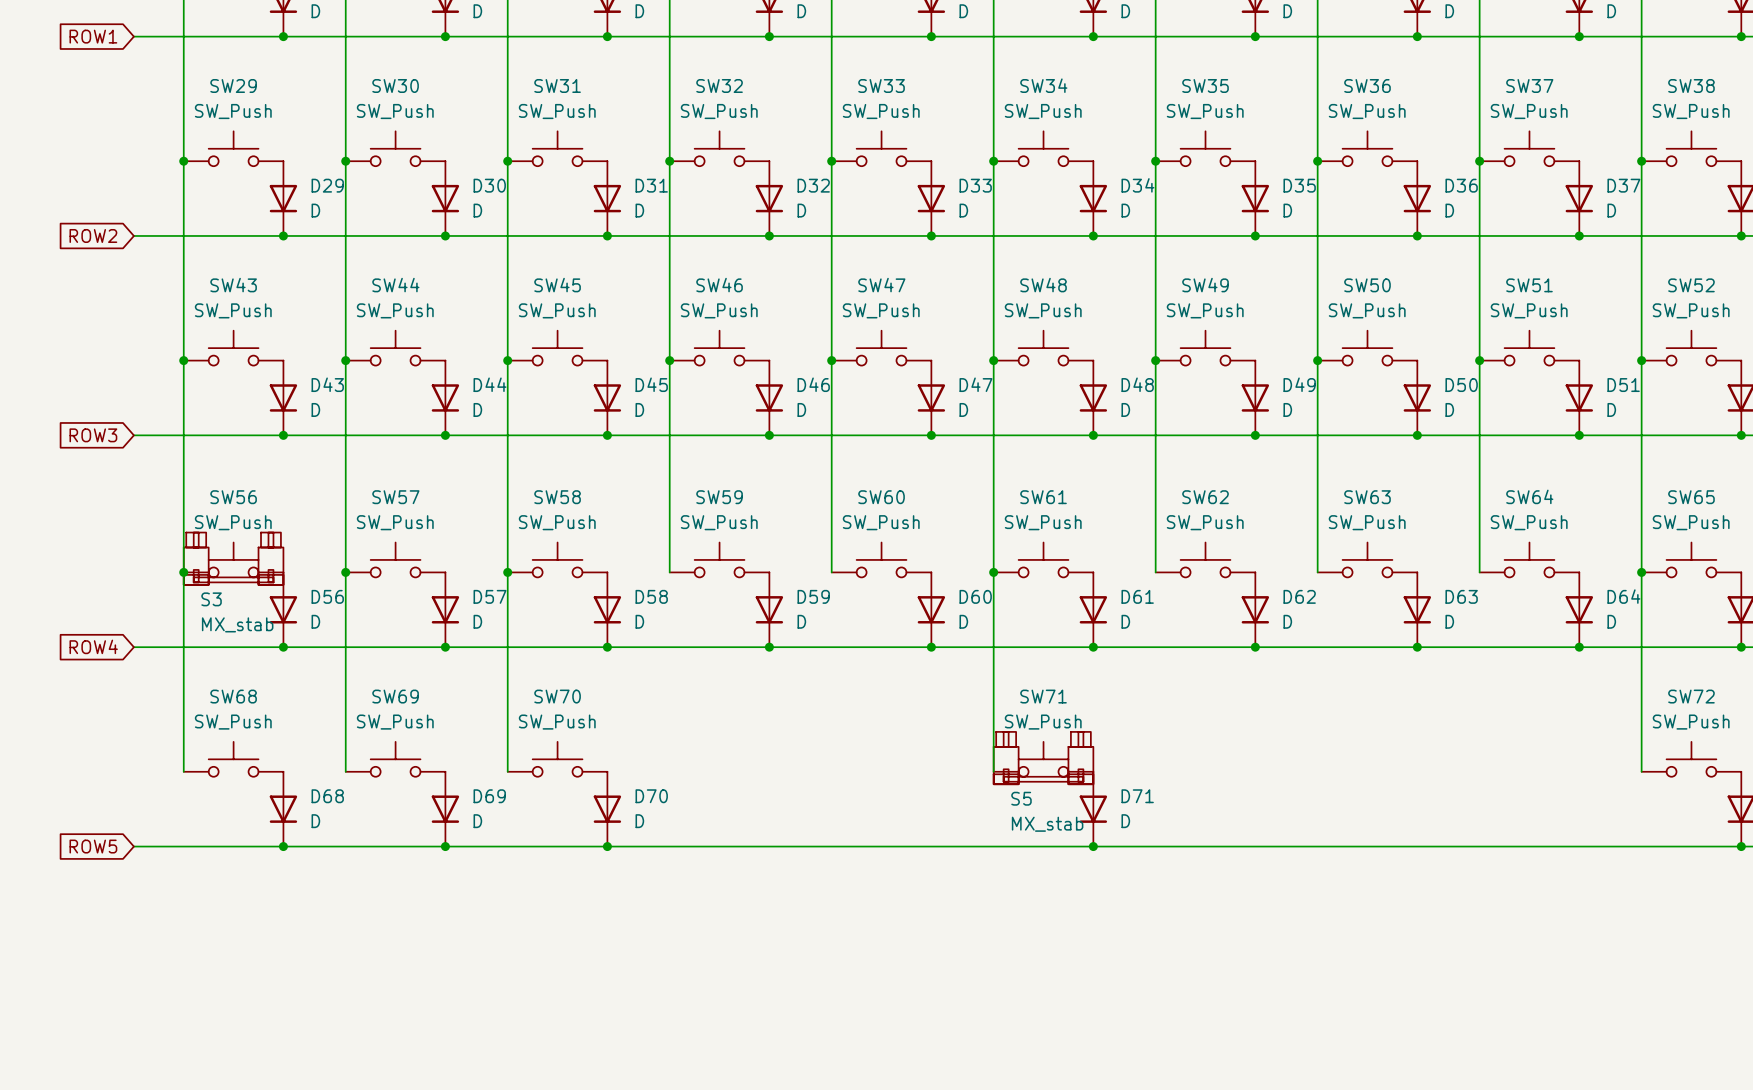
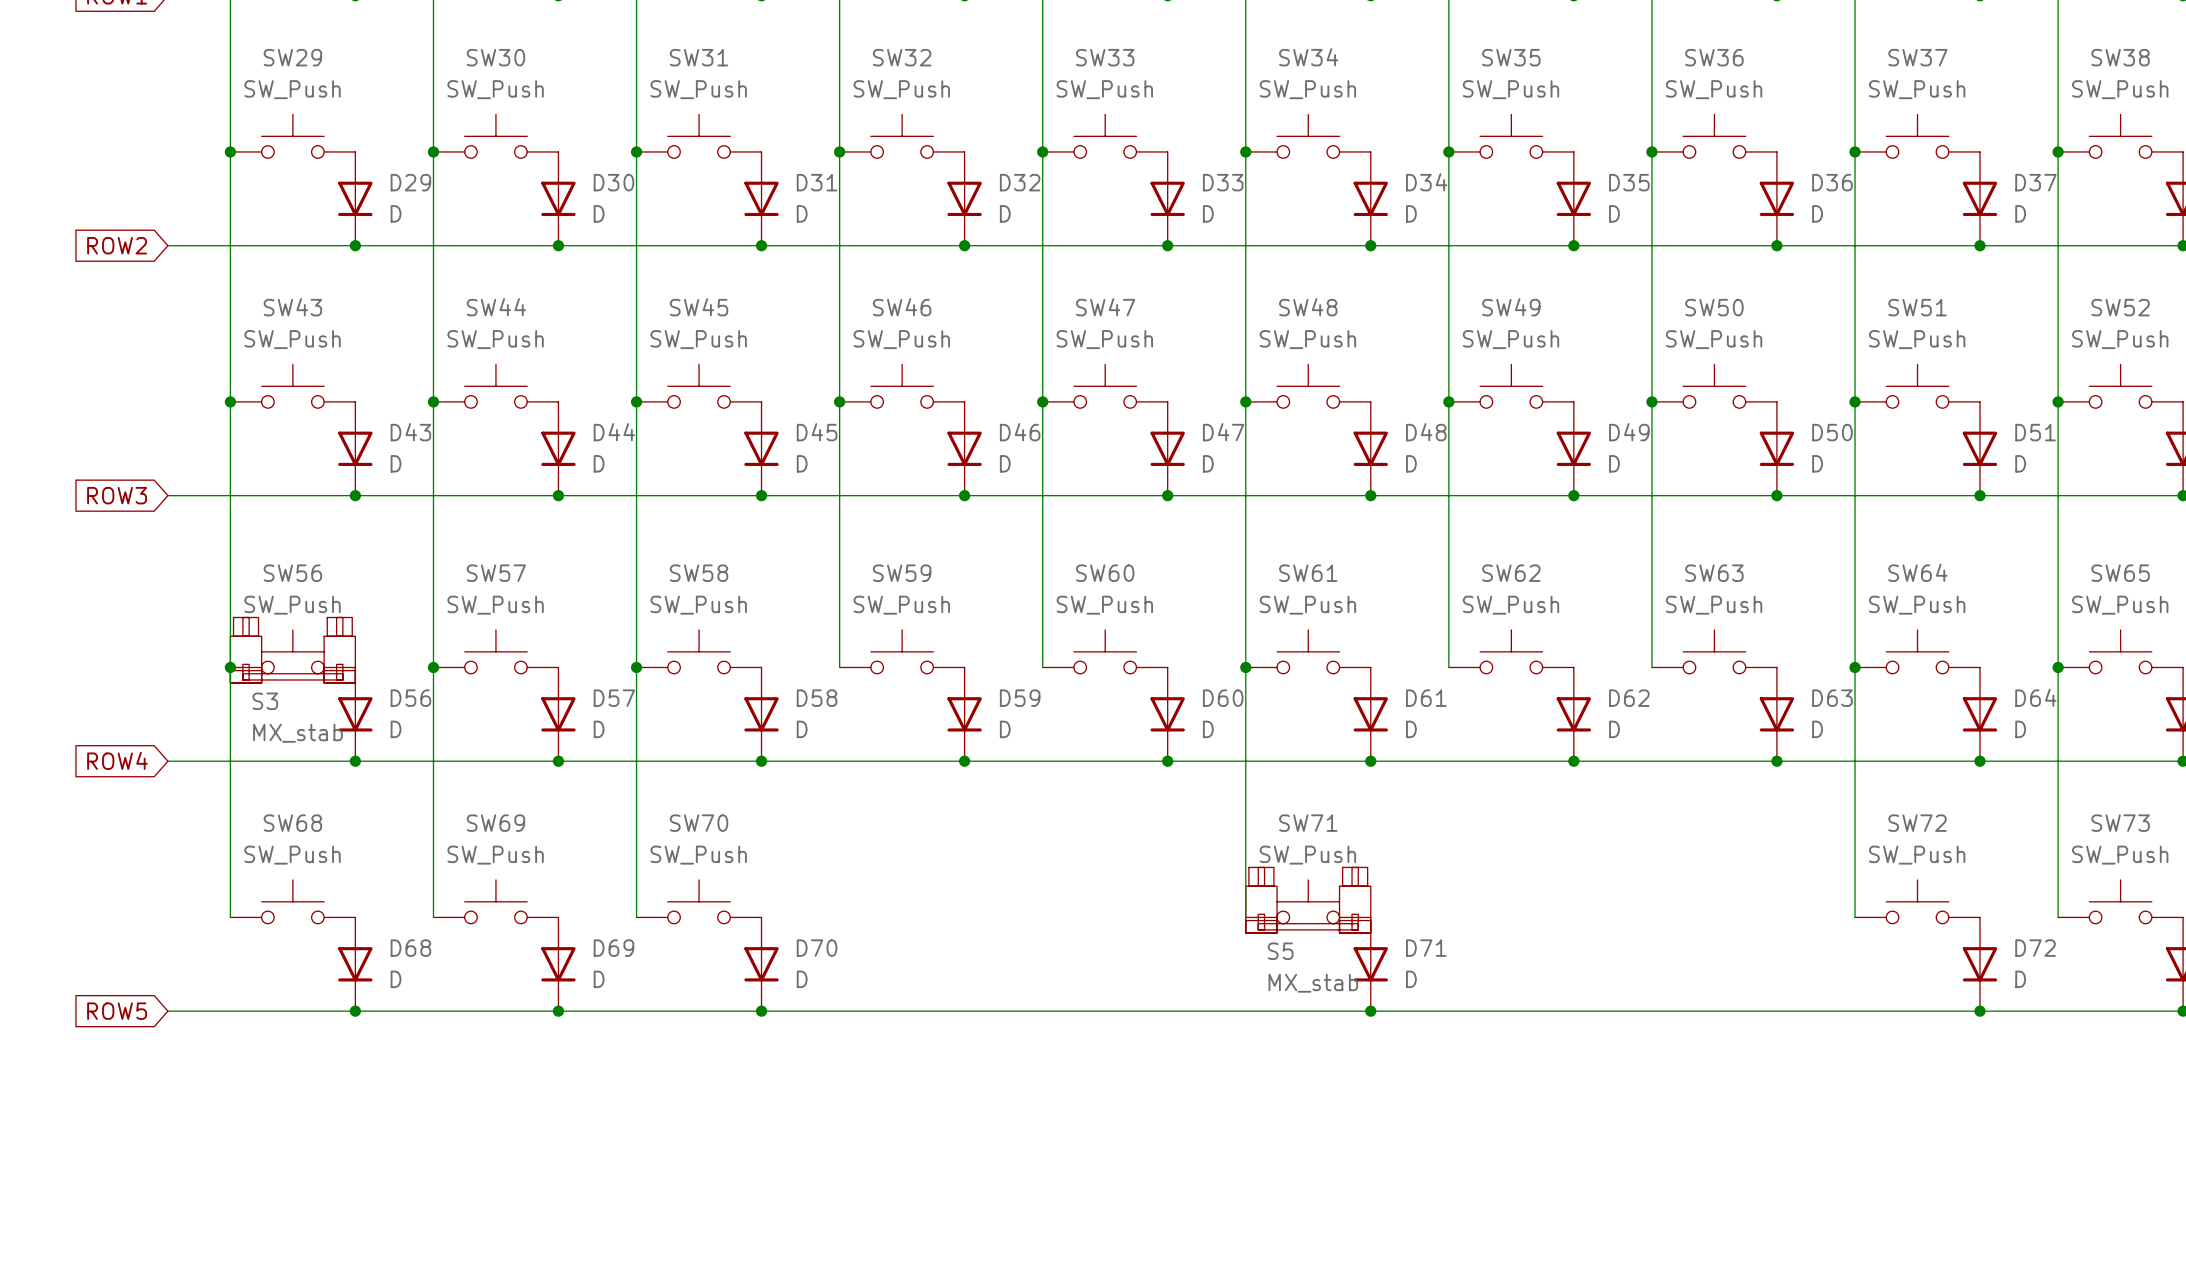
wire: none -> (1855, 667) (1855, 917)
junction: none -> (1855, 667)
SW72 name: SW72 (1691, 696) -> SW73 (2120, 823)
SW72: none -> SW_Push (1917, 901)
D72: none -> D (1979, 964)
junction: none -> (1979, 1011)

